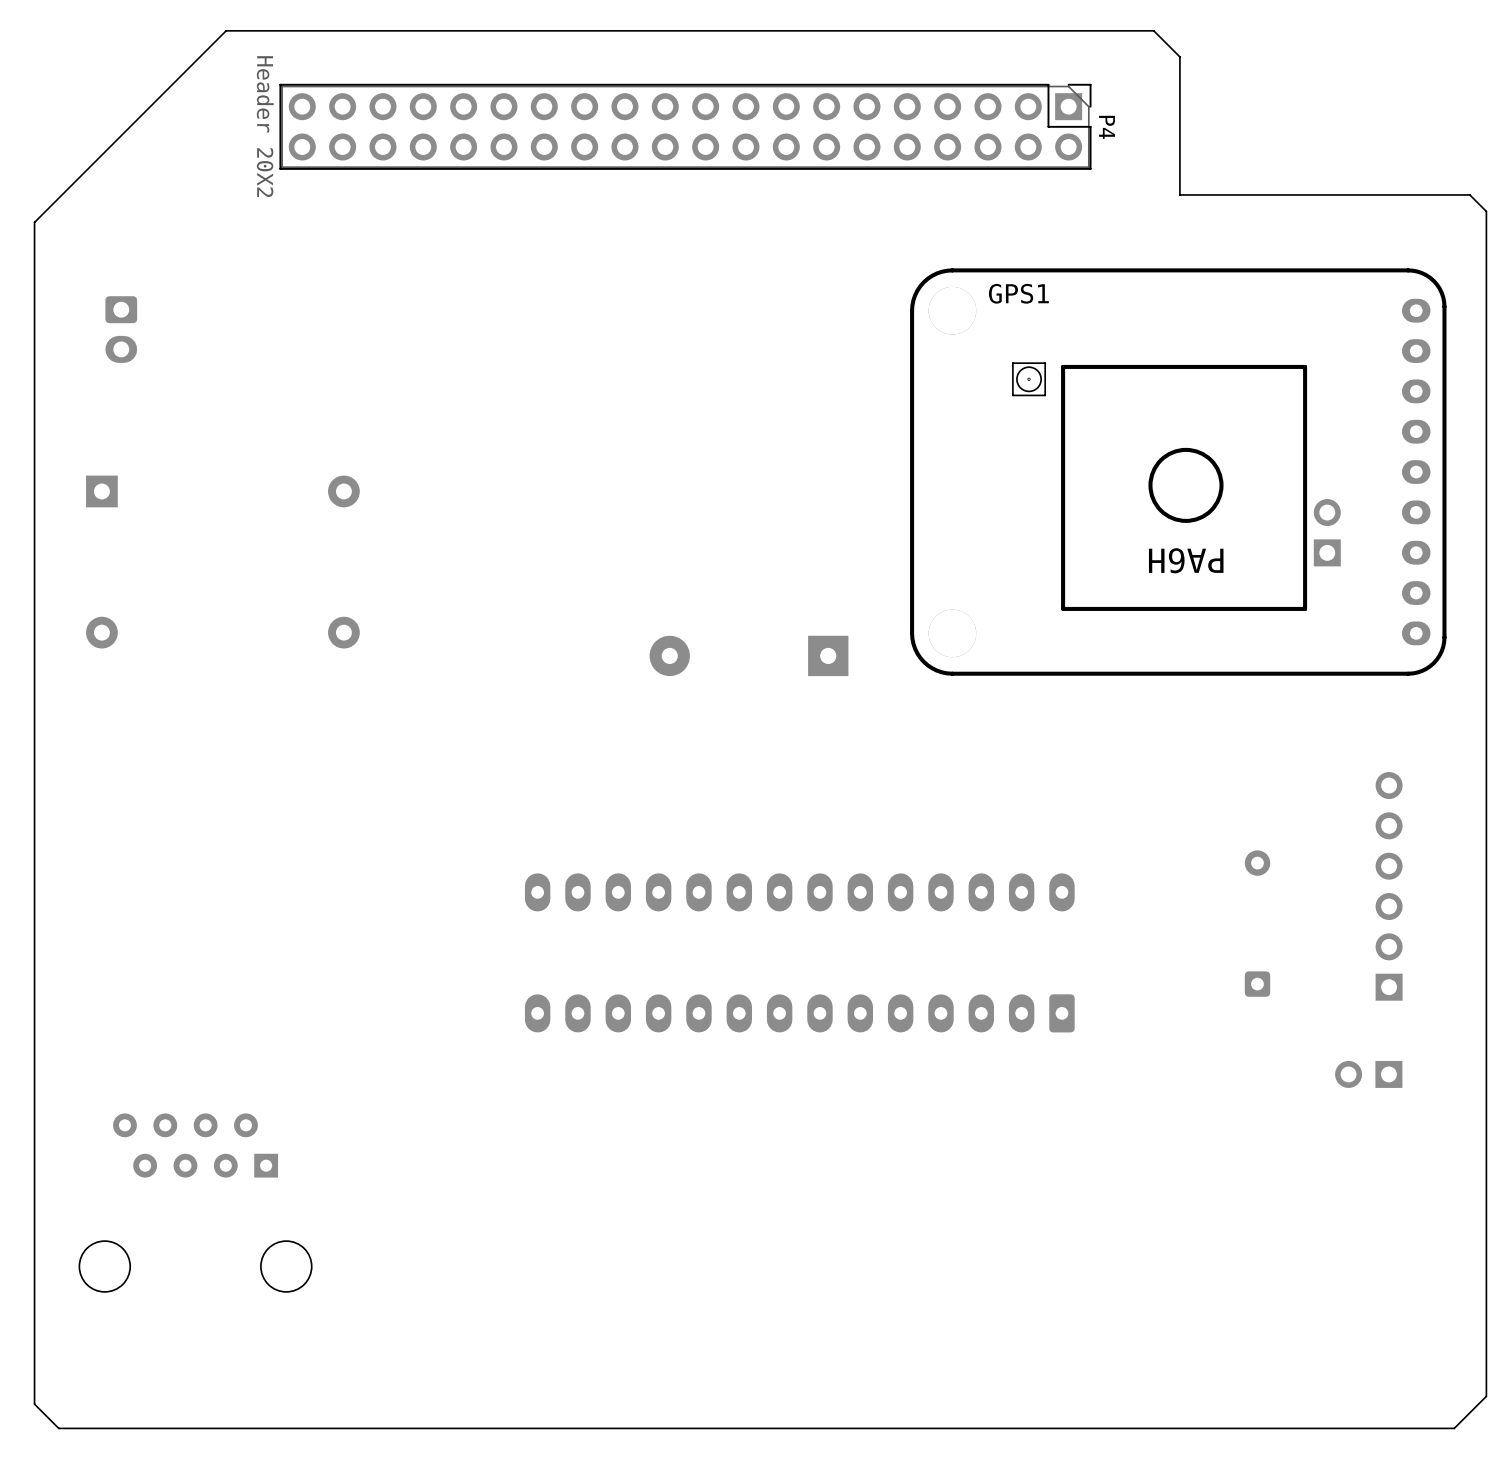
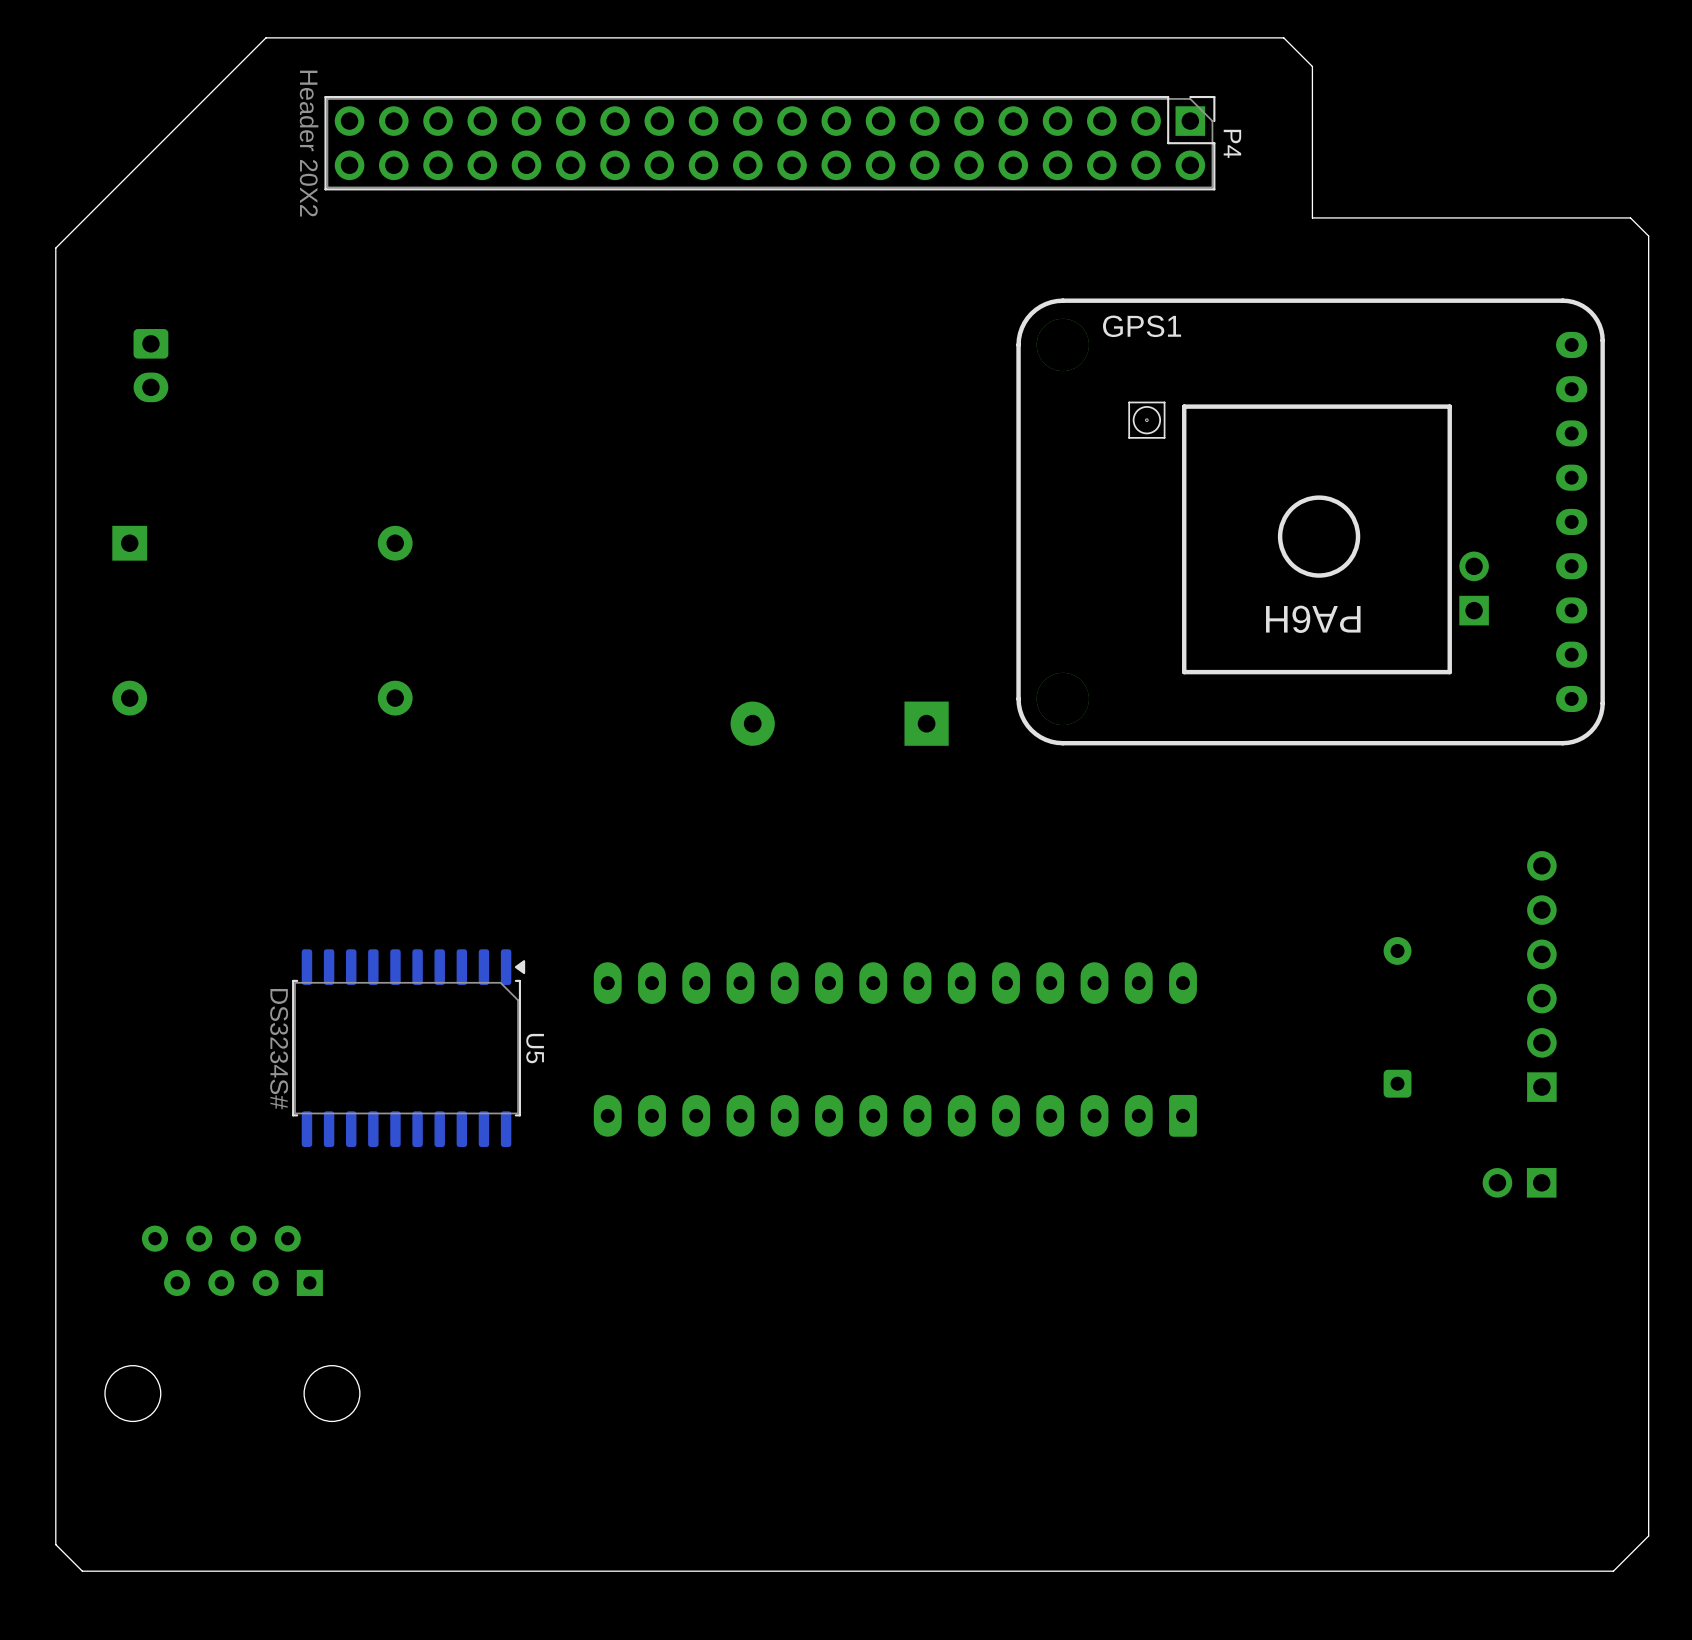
U5: none -> DS3234S# (408, 1048)

